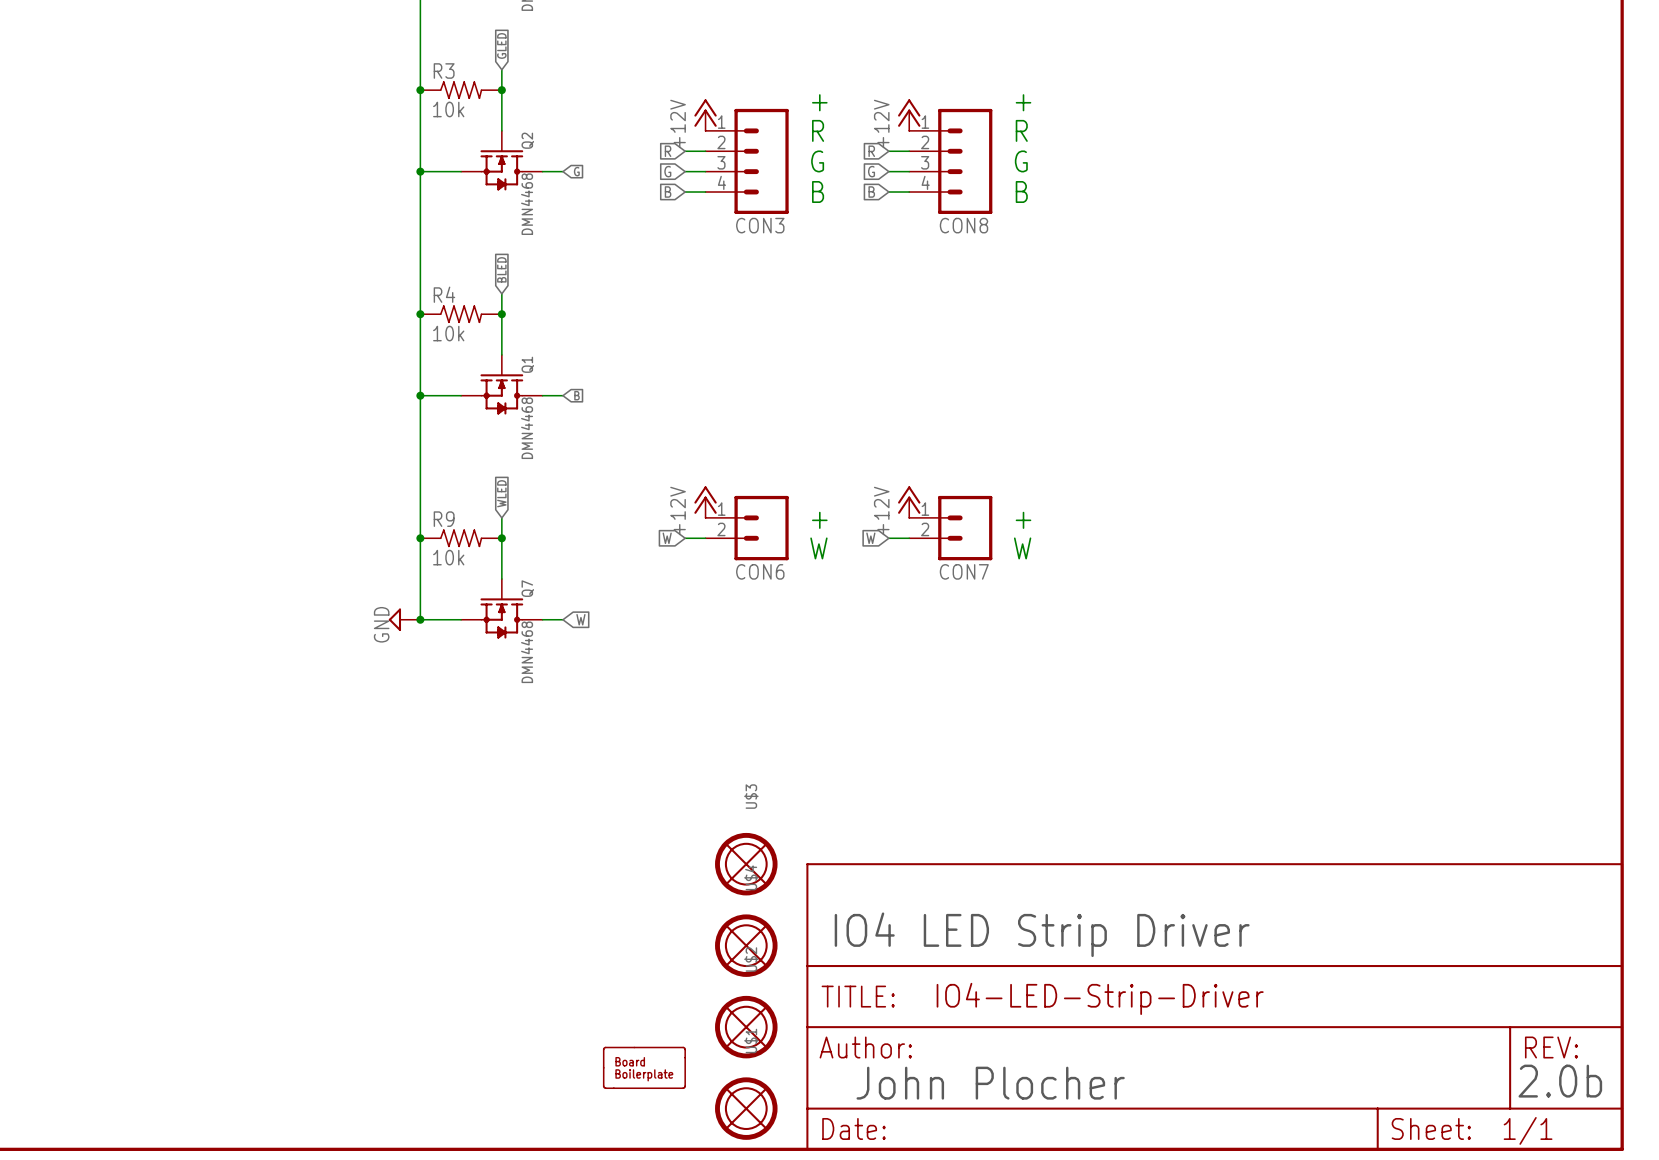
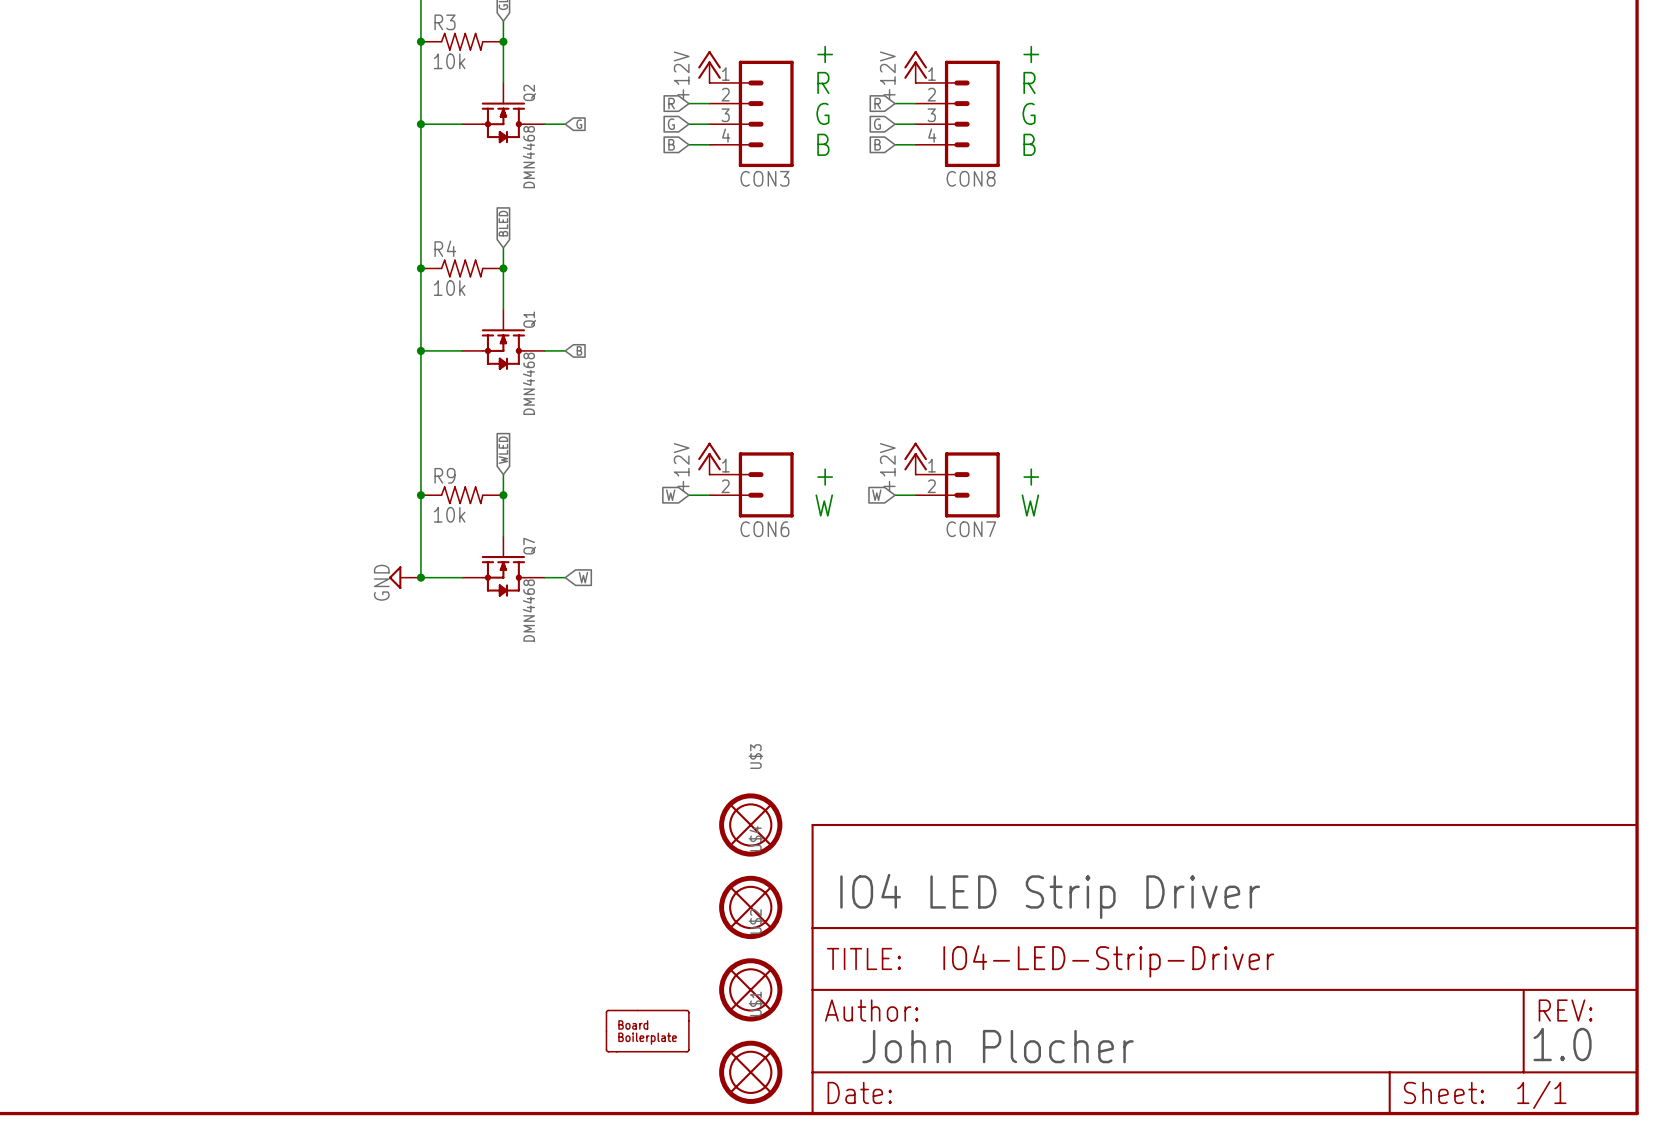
text: 2.0b (1560, 1081) -> 1.0 (1562, 1044)

